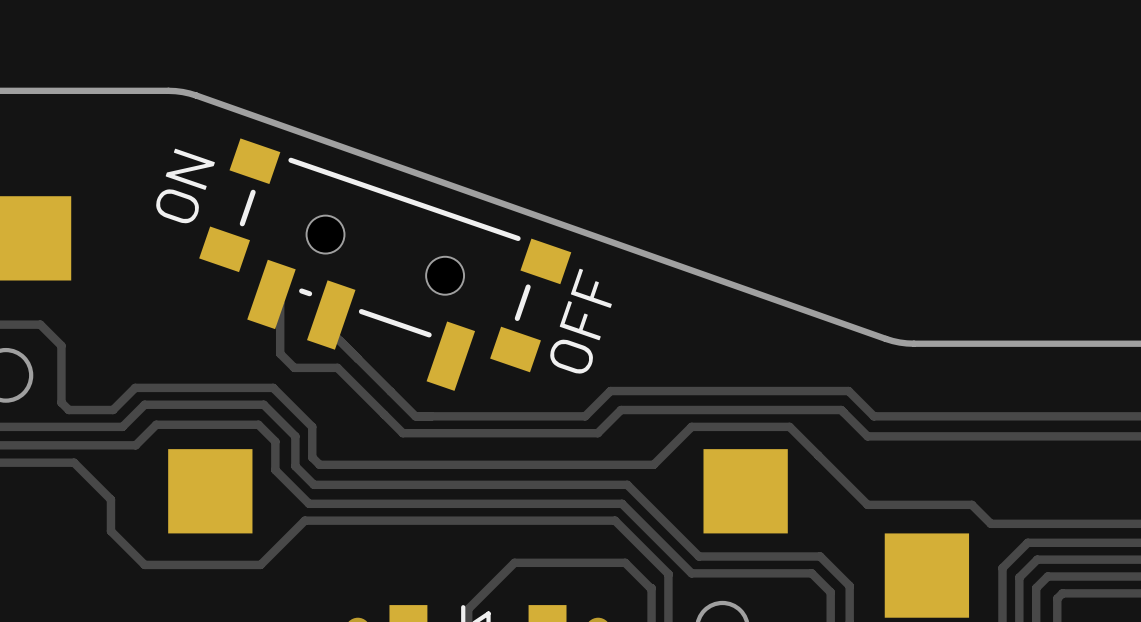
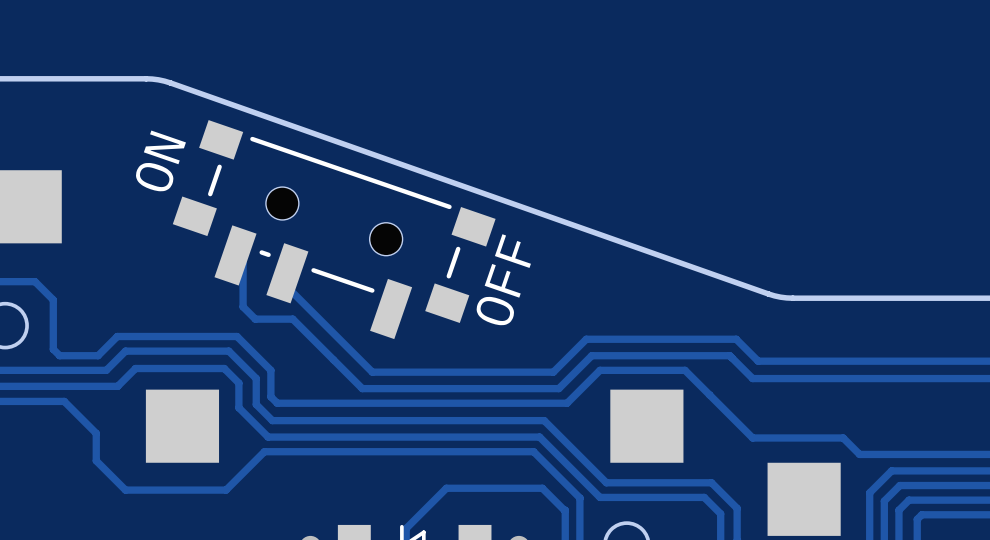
track: (331, 332) (415, 416) (585, 416) (610, 391) (675, 391) -> (287, 287) (372, 372) (553, 372) (586, 339)
track: (682, 410) (621, 410) (597, 433) (402, 433) -> (591, 355) (558, 388) (362, 388) (349, 375)

